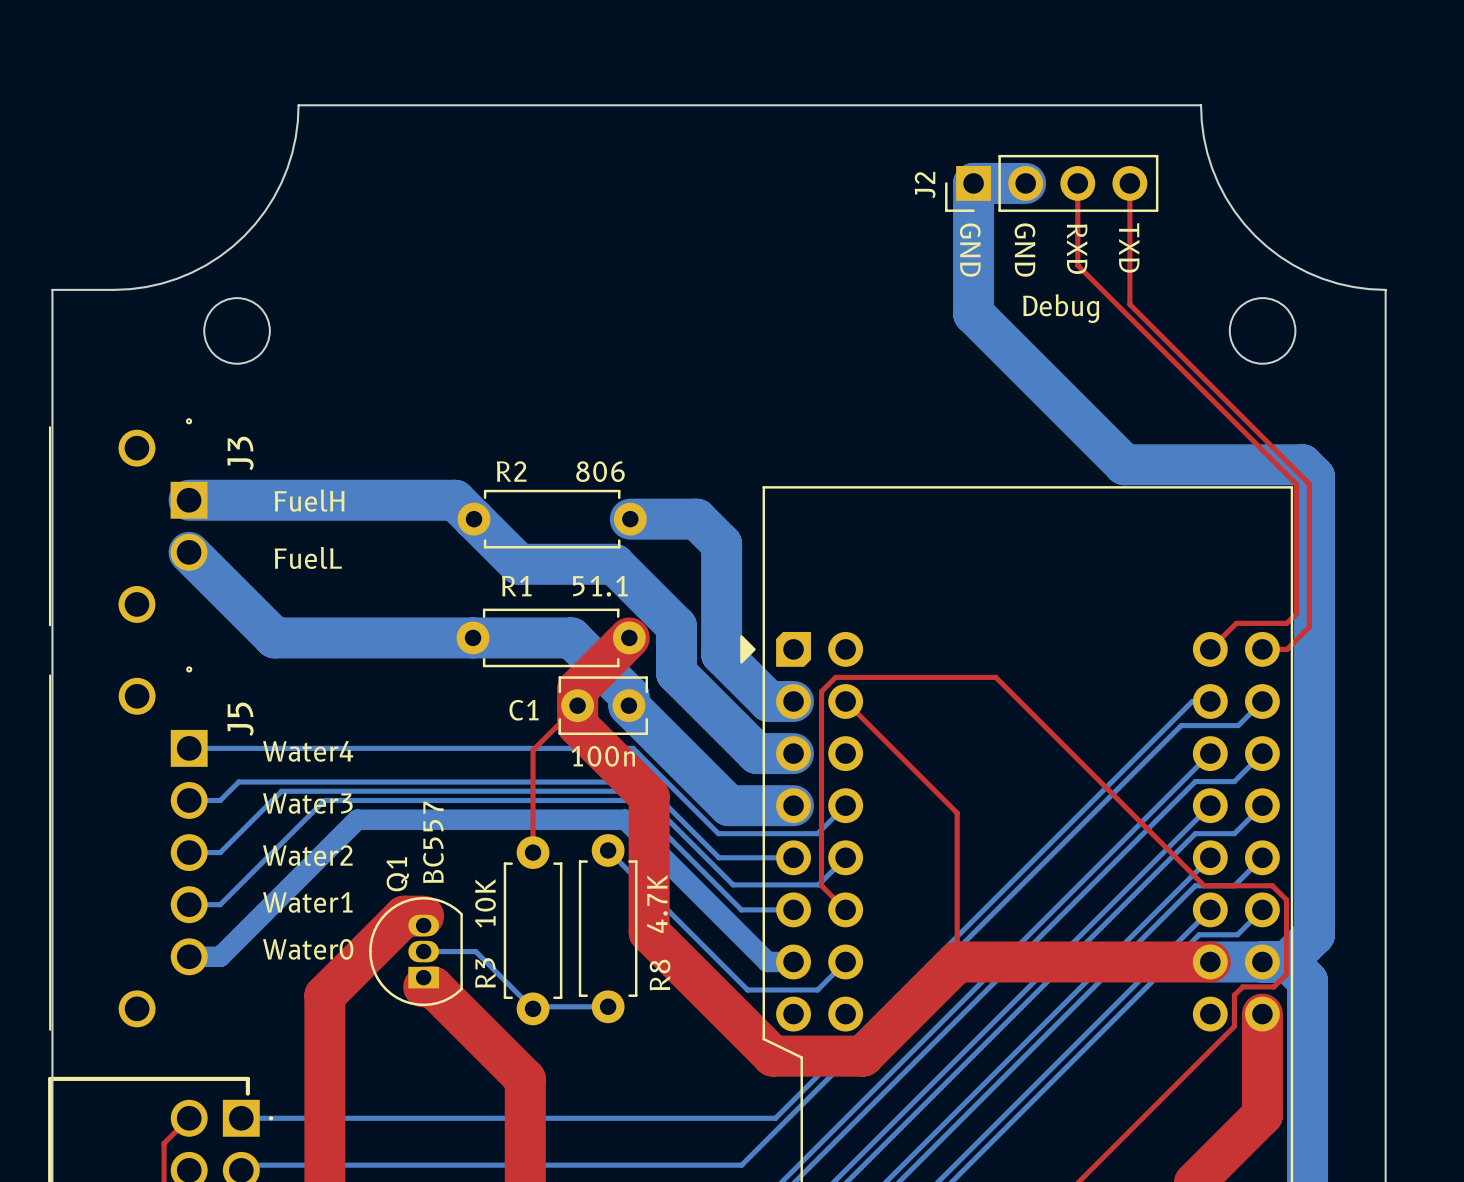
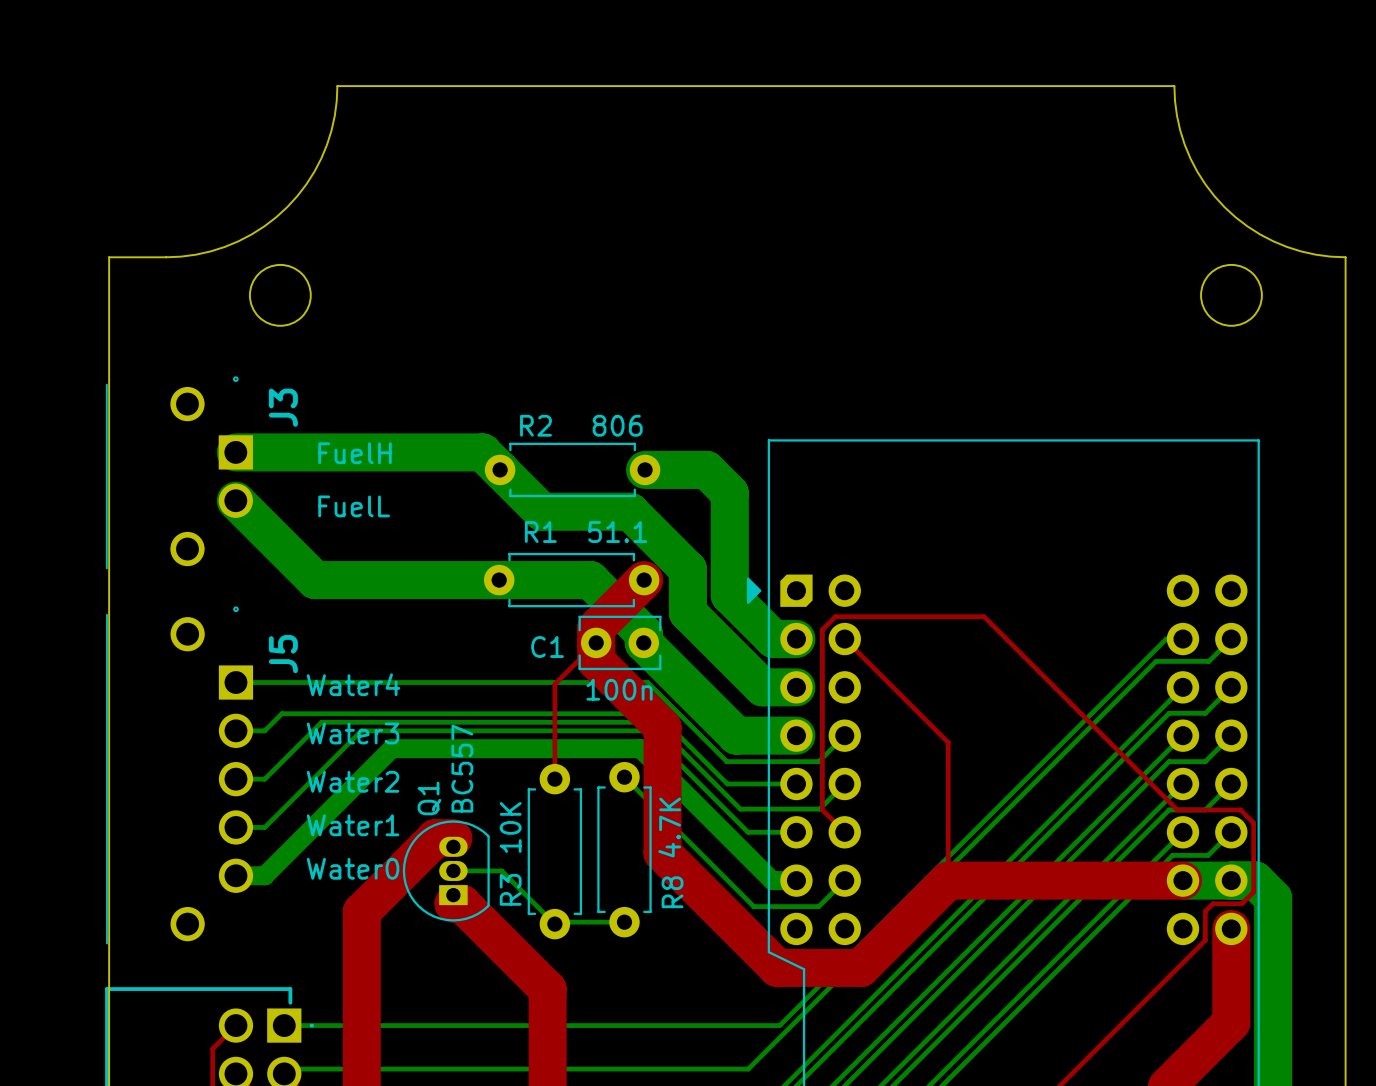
bottom track: (1025, 183) (973, 183) (973, 313) (1124, 464) (1302, 464) (1314, 476) (1314, 934) (1287, 961) -> none
J2: Debug (1051, 183) -> none
top track: (1077, 183) (1077, 265) (1296, 484) (1296, 613) (1286, 623) (1236, 623) (1210, 649) -> none
top track: (1129, 183) (1129, 304) (1309, 483) (1309, 627) (1287, 649) (1262, 649) -> none
text: TXD (1129, 247) -> none
text: RXD (1077, 249) -> none
text: GND (970, 250) -> none
text: GND (1025, 250) -> none

